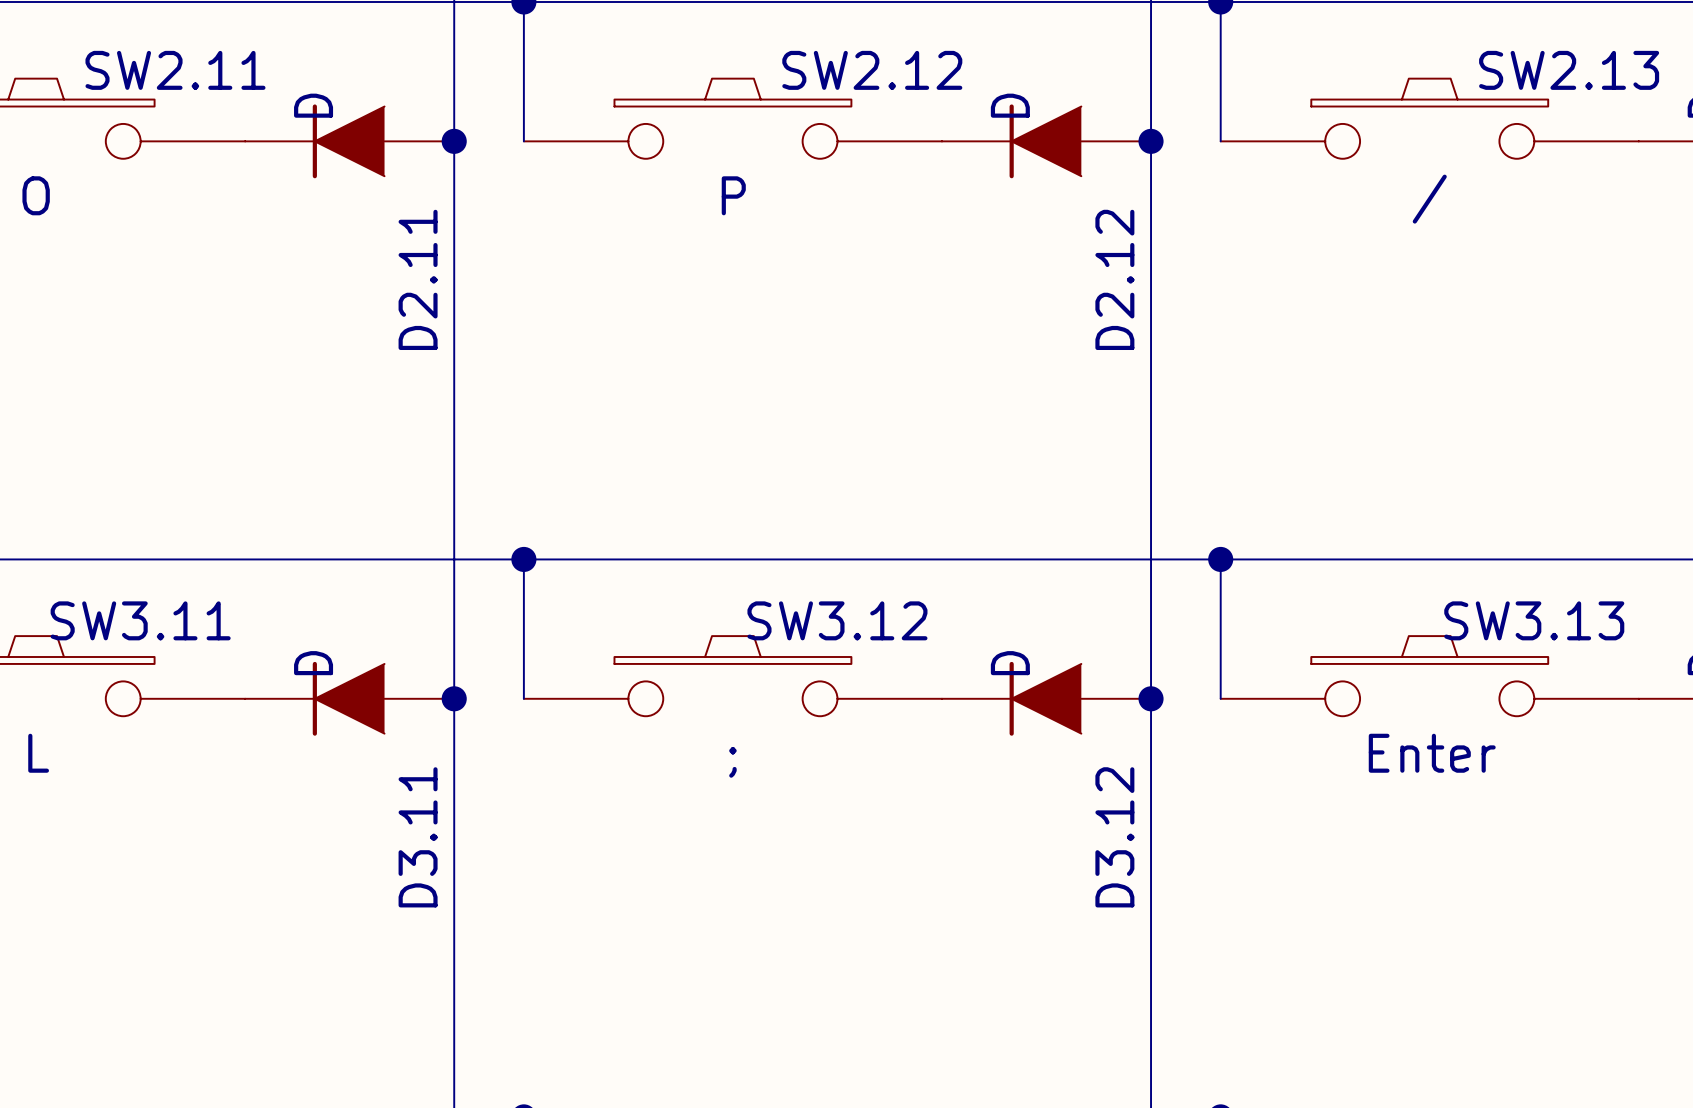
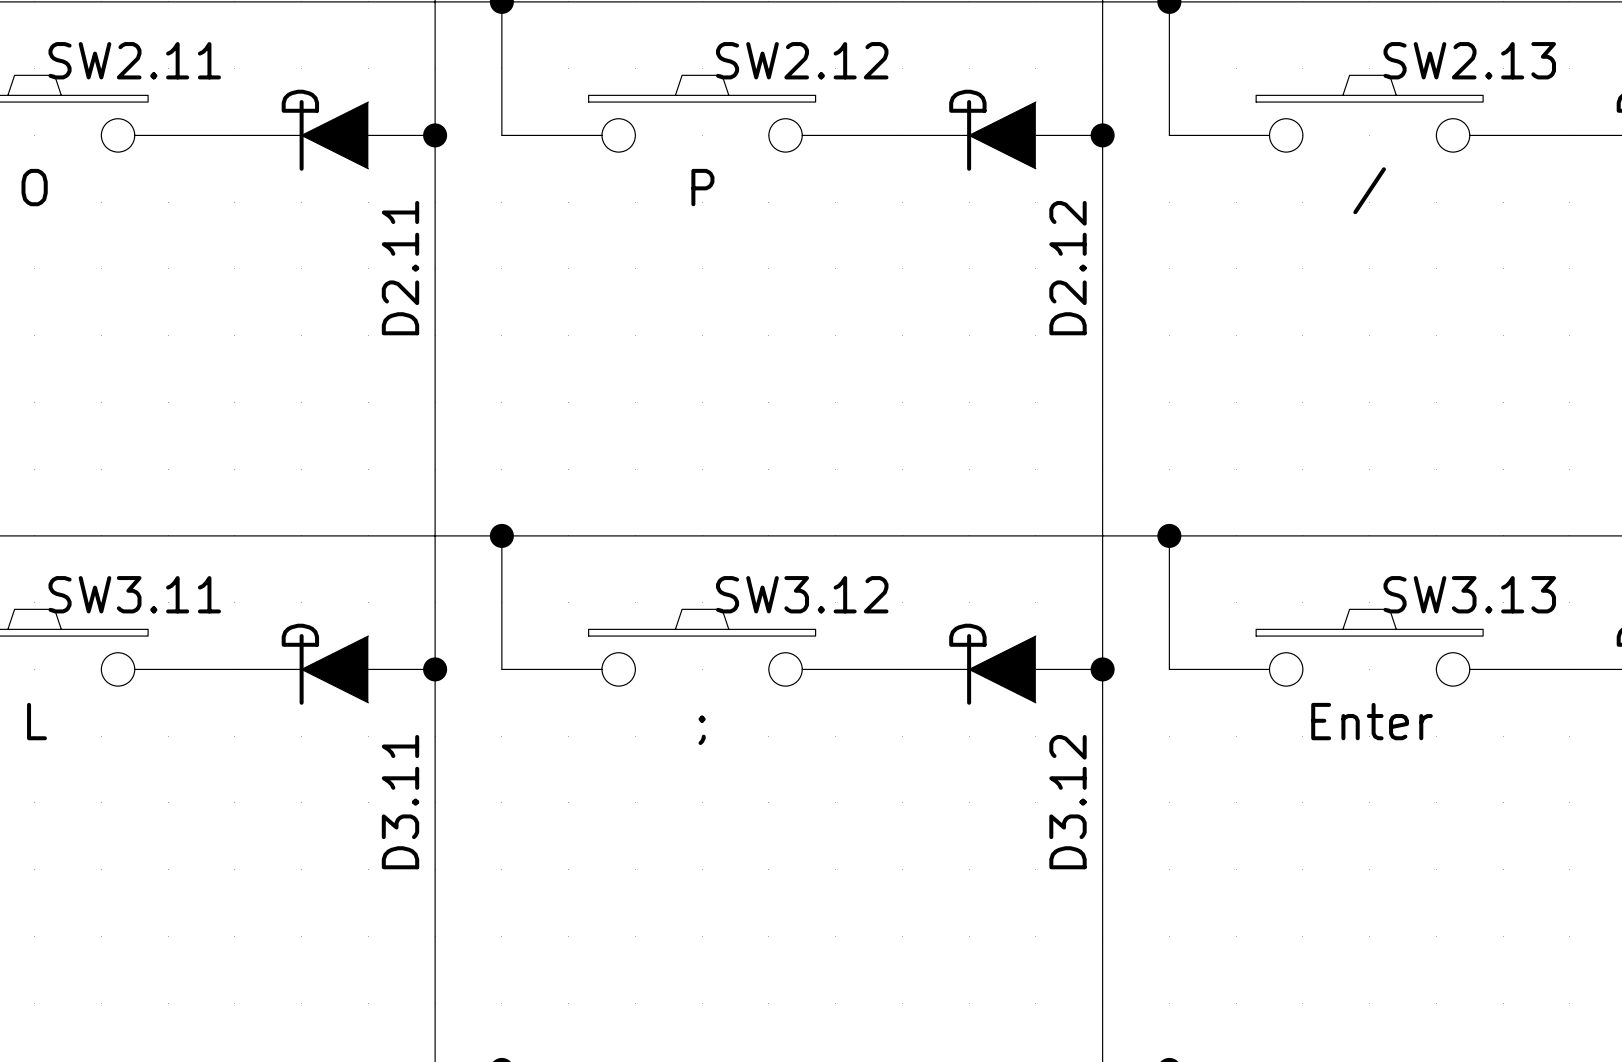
SW2.11 name position: SW2.11 (175, 70) -> SW2.11 (134, 60)
SW2.12 name position: SW2.12 (872, 70) -> SW2.12 (802, 60)
SW2.13 name position: SW2.13 (1569, 70) -> SW2.13 (1469, 60)

